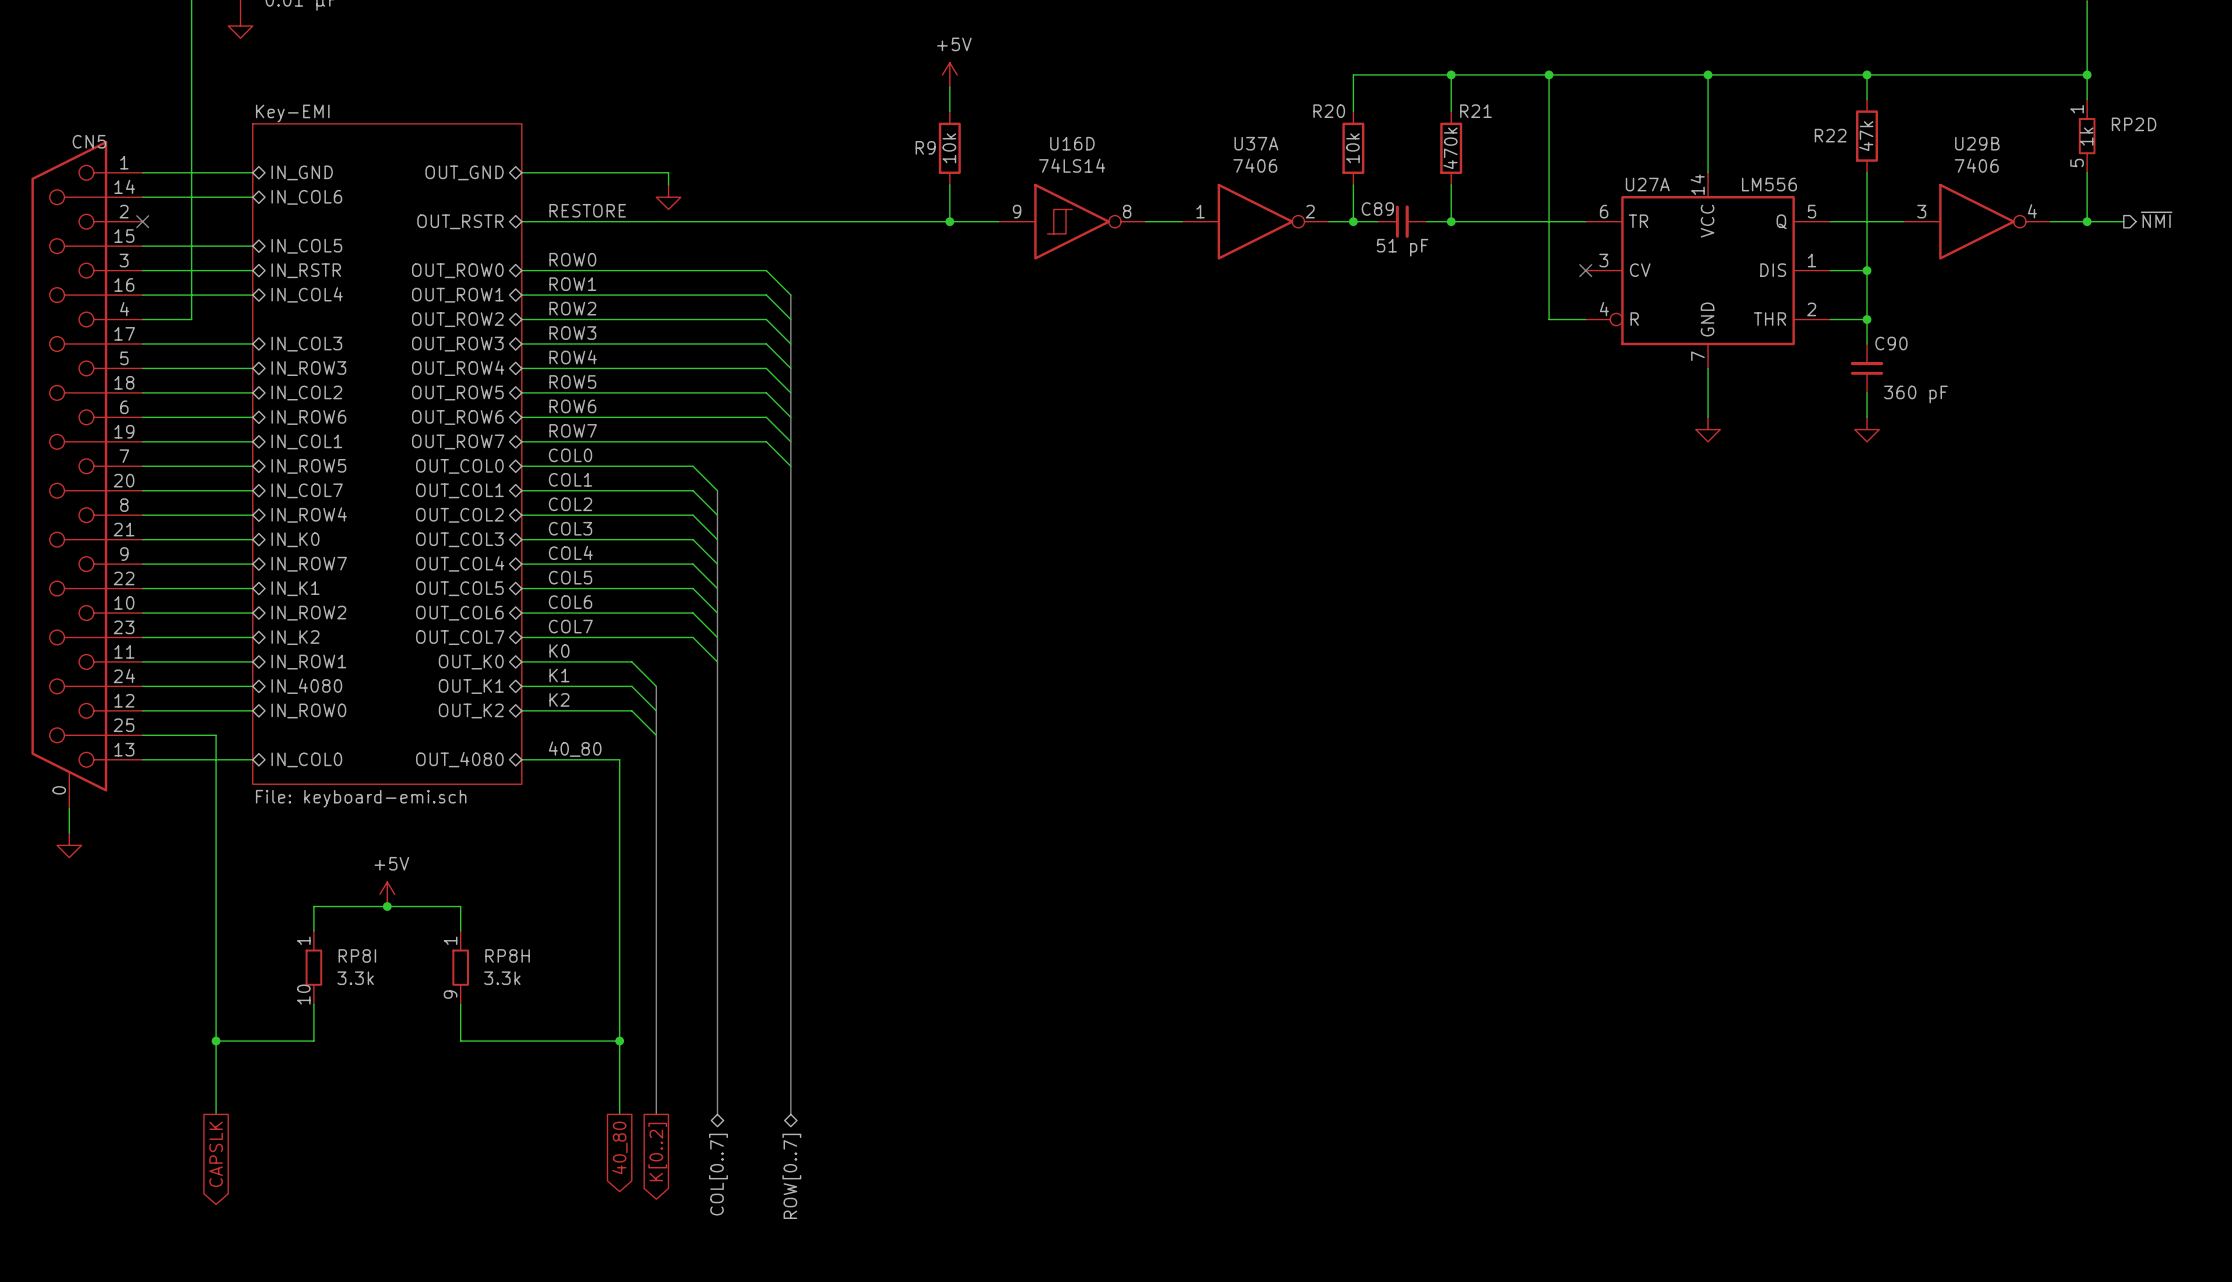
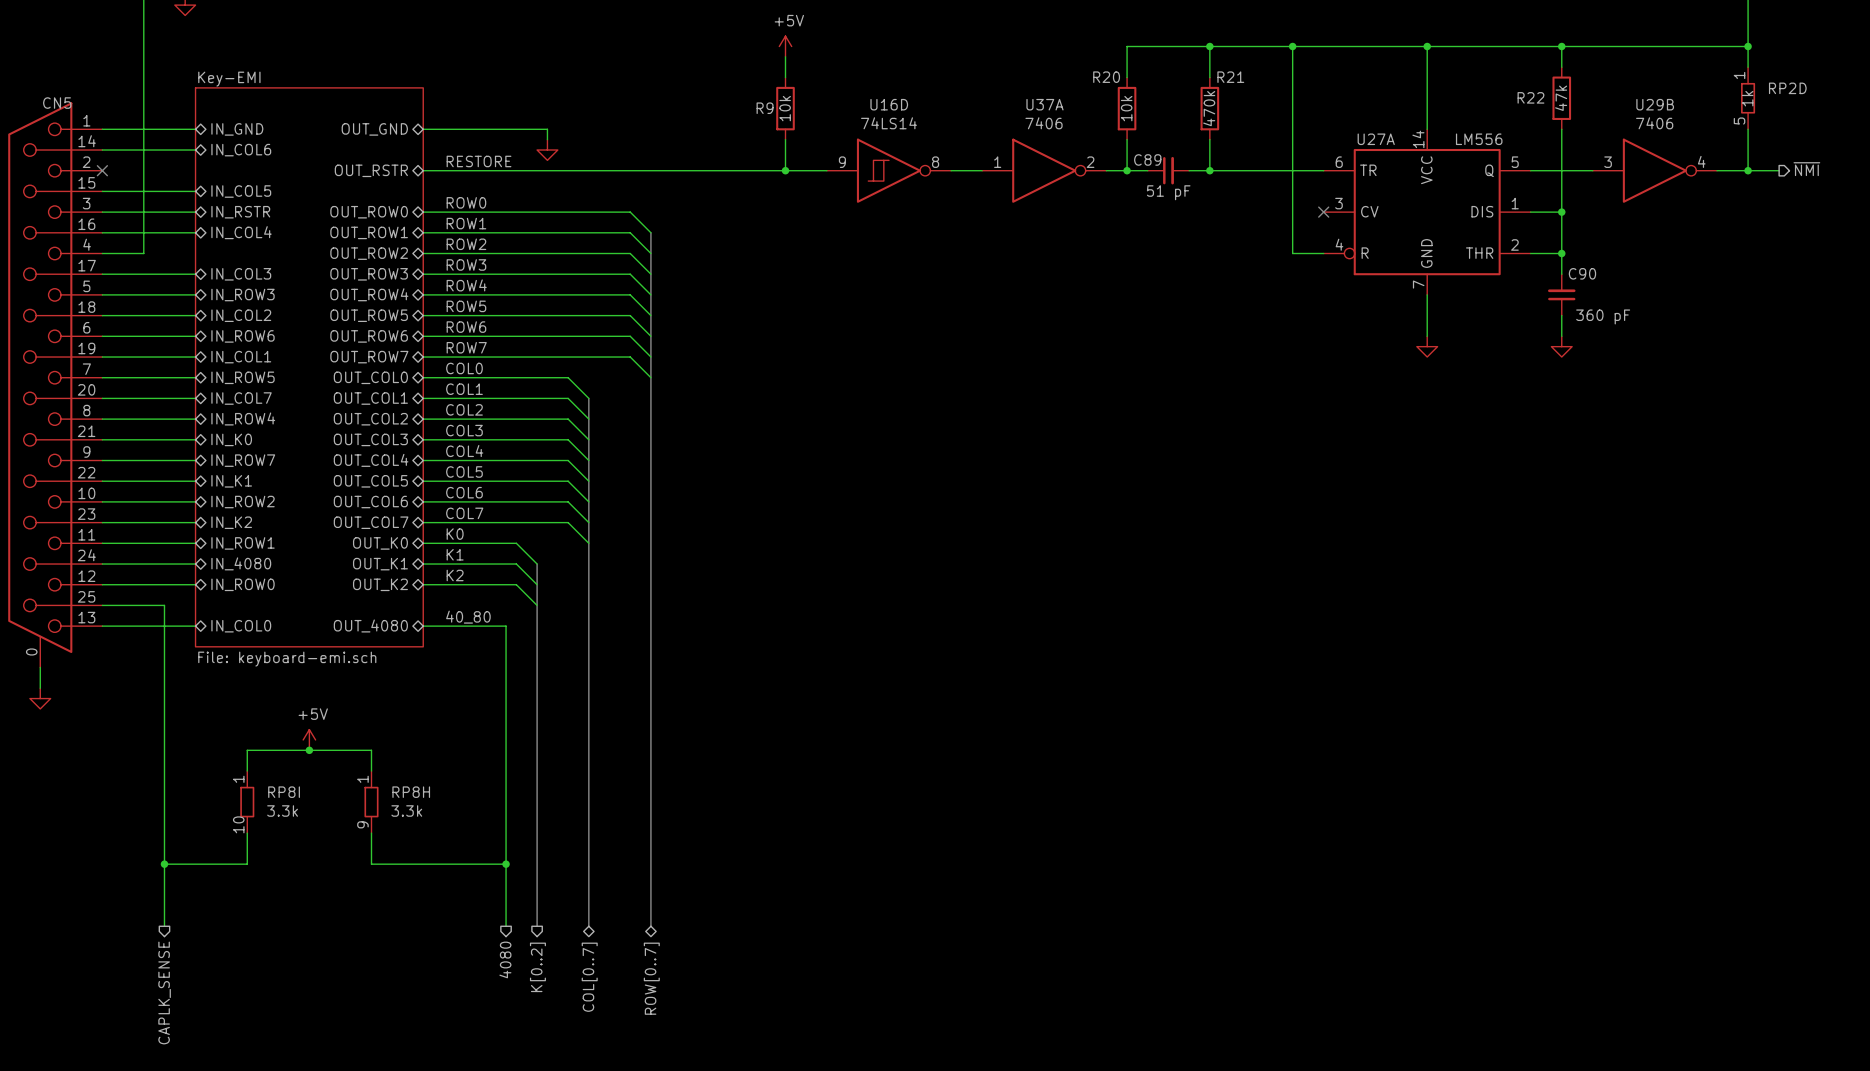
global label: 40_80 (619, 1147) -> none
global label: K[0..2] (657, 1152) -> none
global label: CAPSLK (216, 1154) -> none
hierarchical label: none -> 4080 (505, 959)
hierarchical label: none -> K[0..2] (537, 967)
hierarchical label: none -> CAPLK_SENSE (164, 992)

